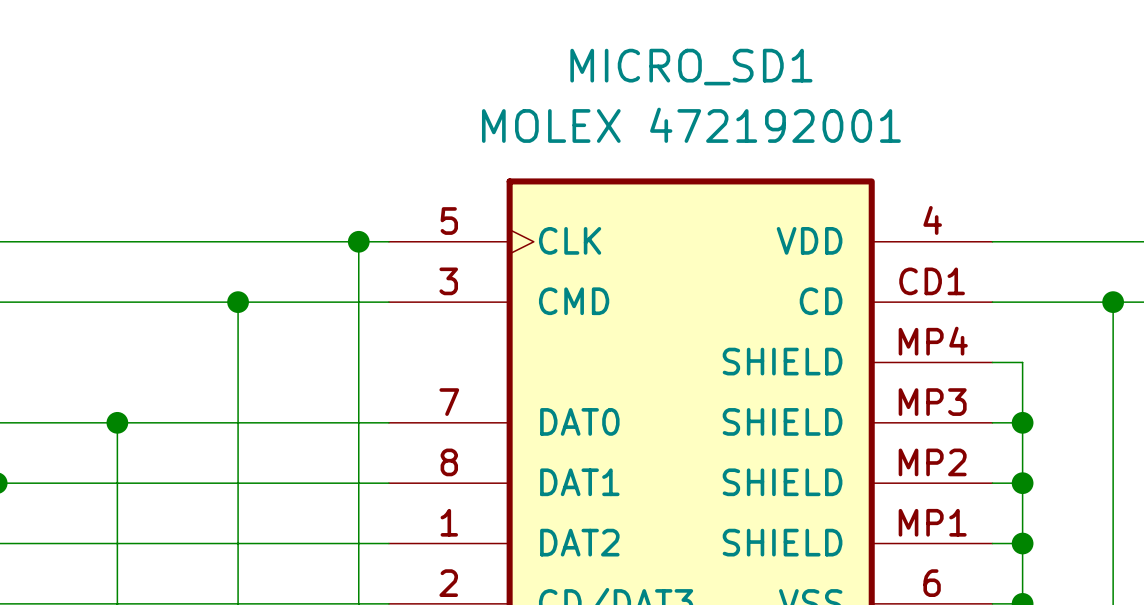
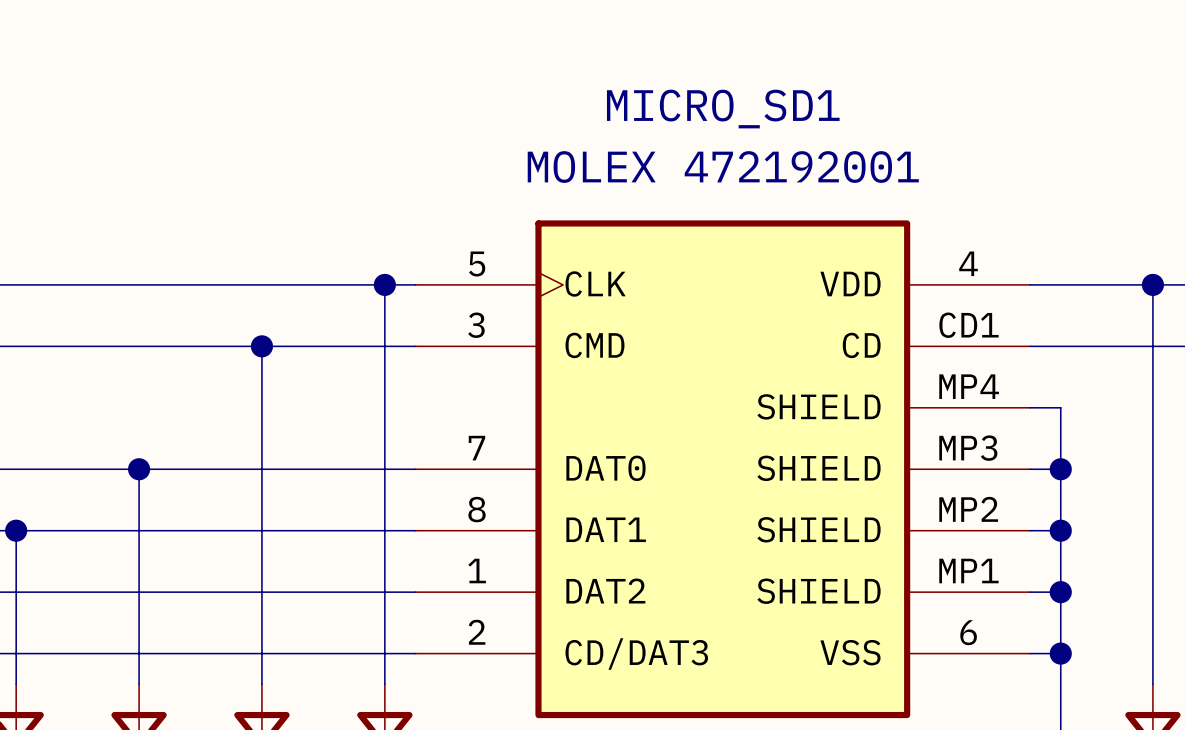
wire: none -> (1152, 284) (1152, 346)
junction position: (1113, 302) -> (1152, 284)

